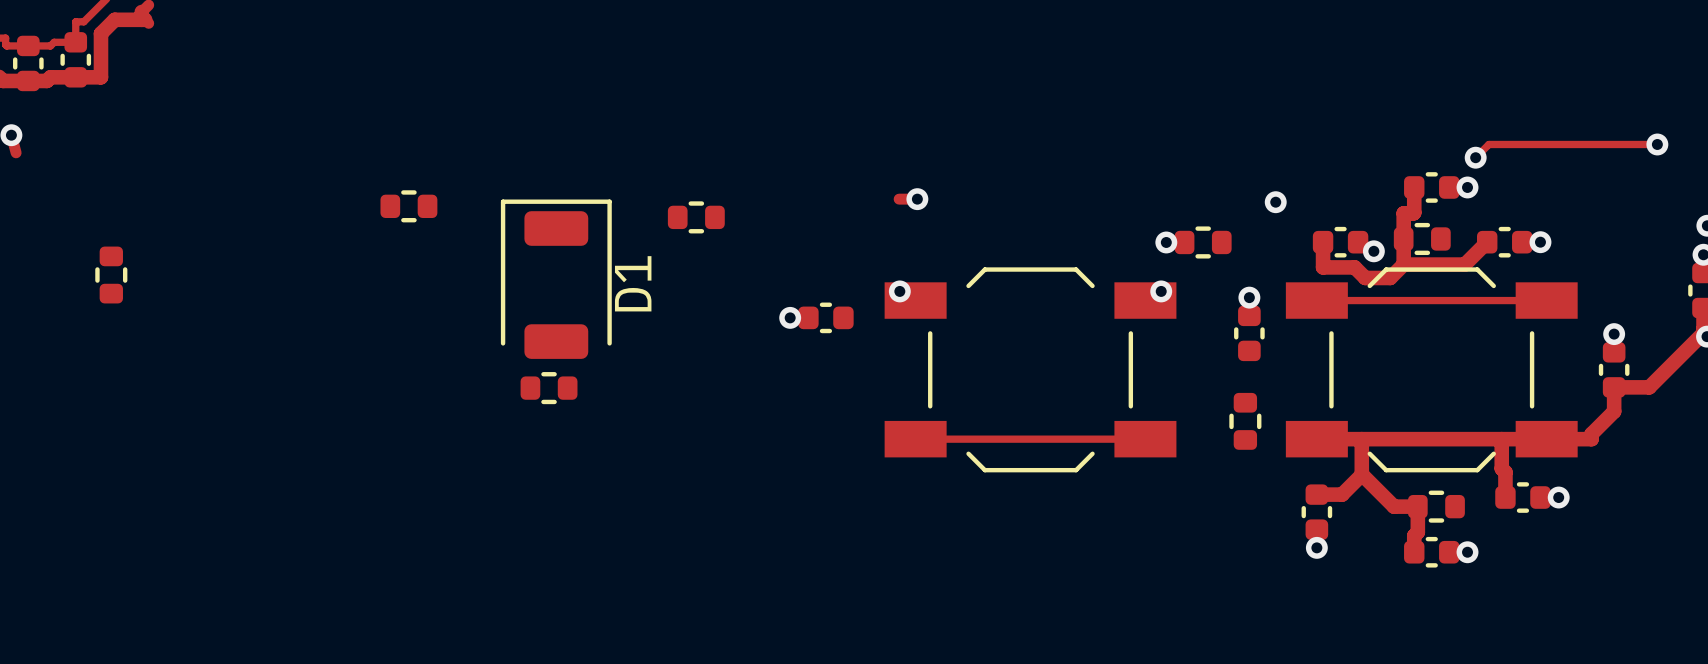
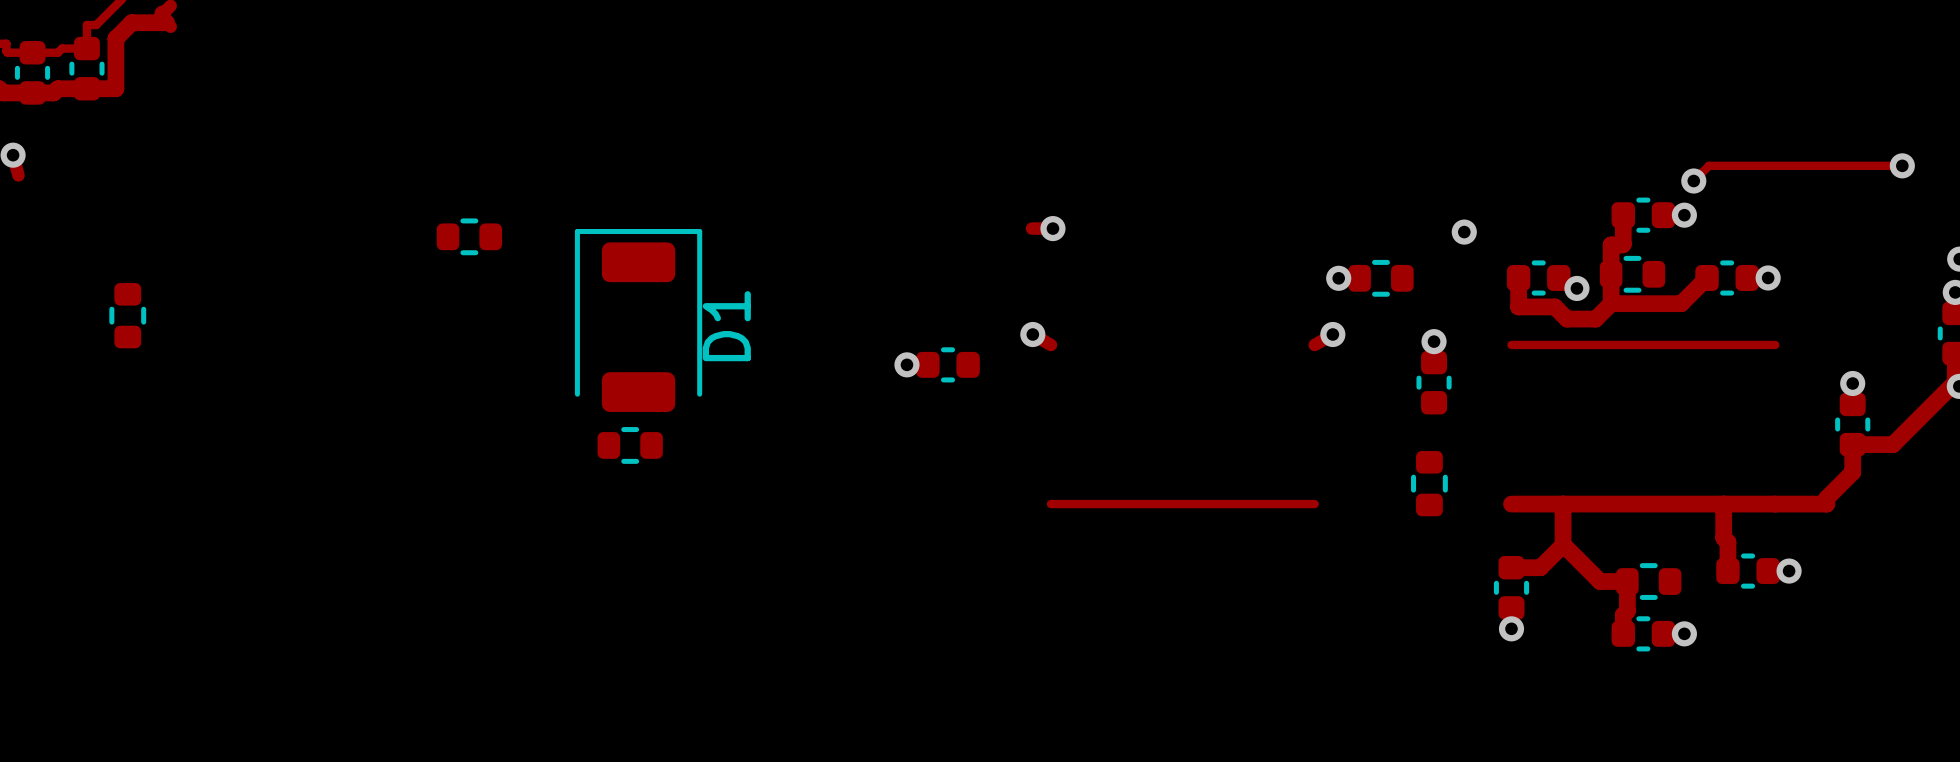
part: (696, 217) -> none
part: (1030, 369) -> none
part: (1431, 369) -> none

